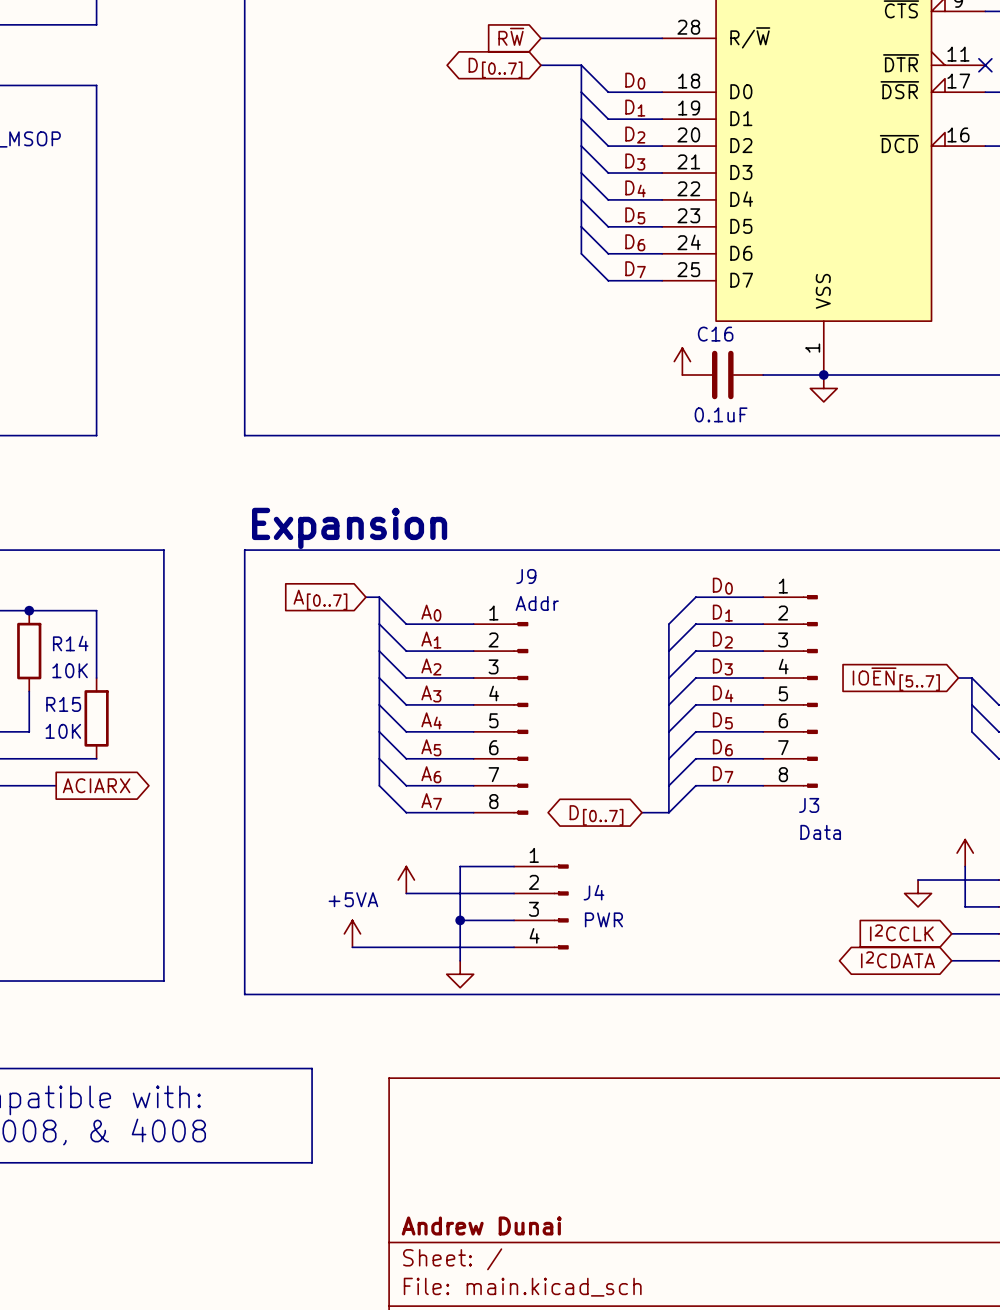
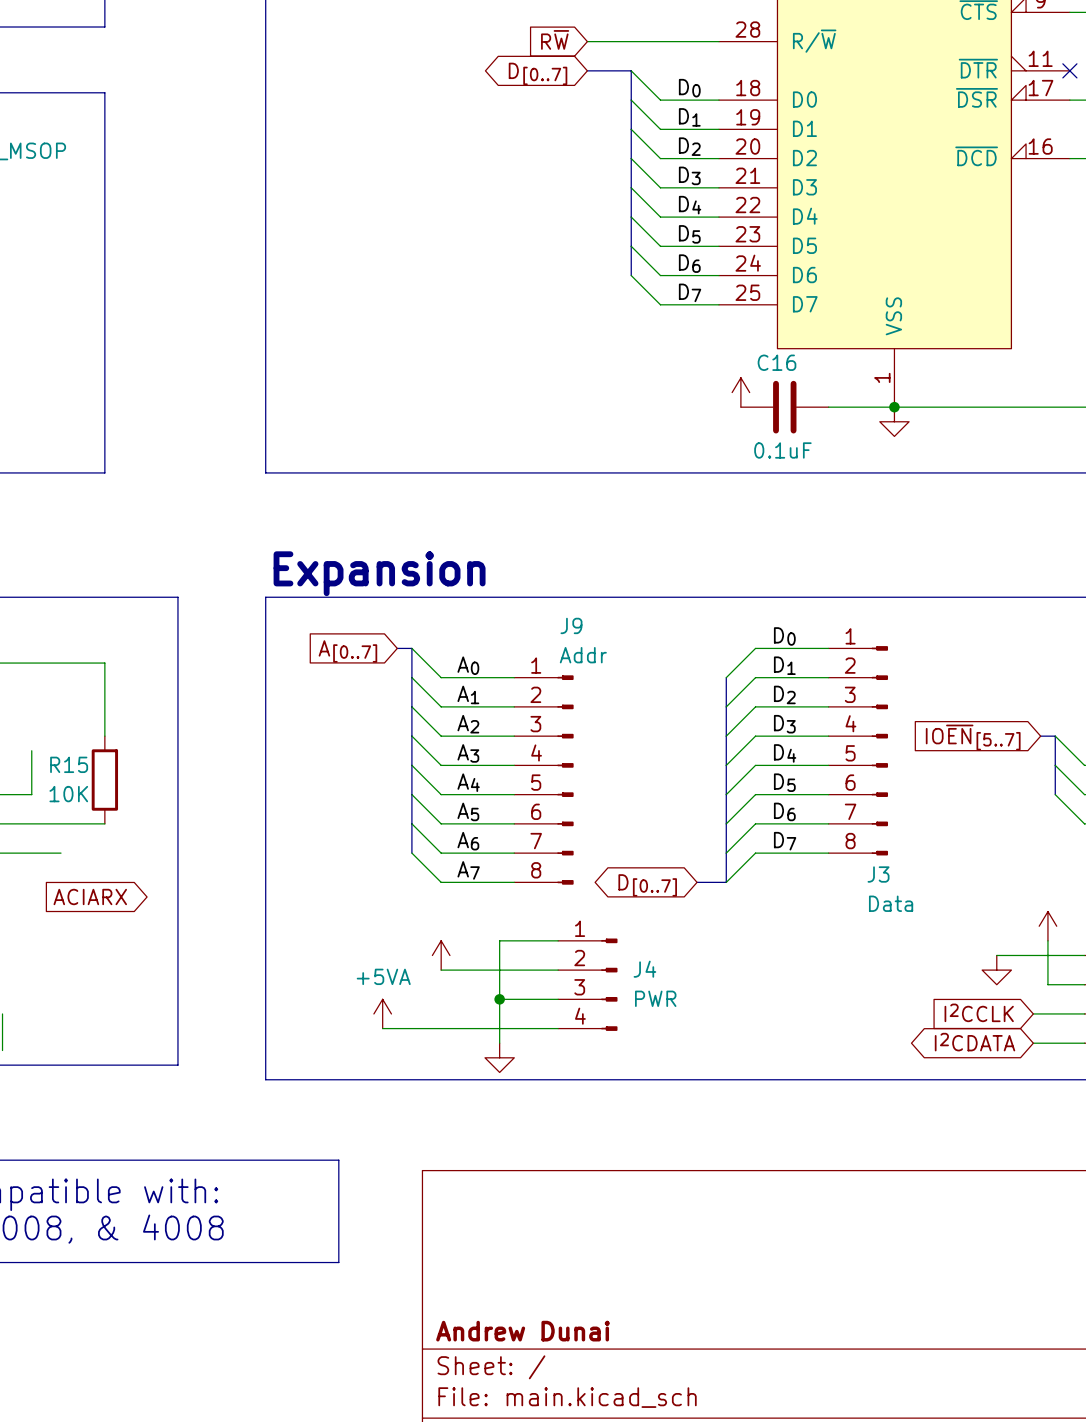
junction: (29, 610) -> none
R14: 10K (29, 651) -> none
global label position: ACIARX (96, 785) -> ACIARX (90, 896)
wire: none -> (2, 1013) (2, 1050)

